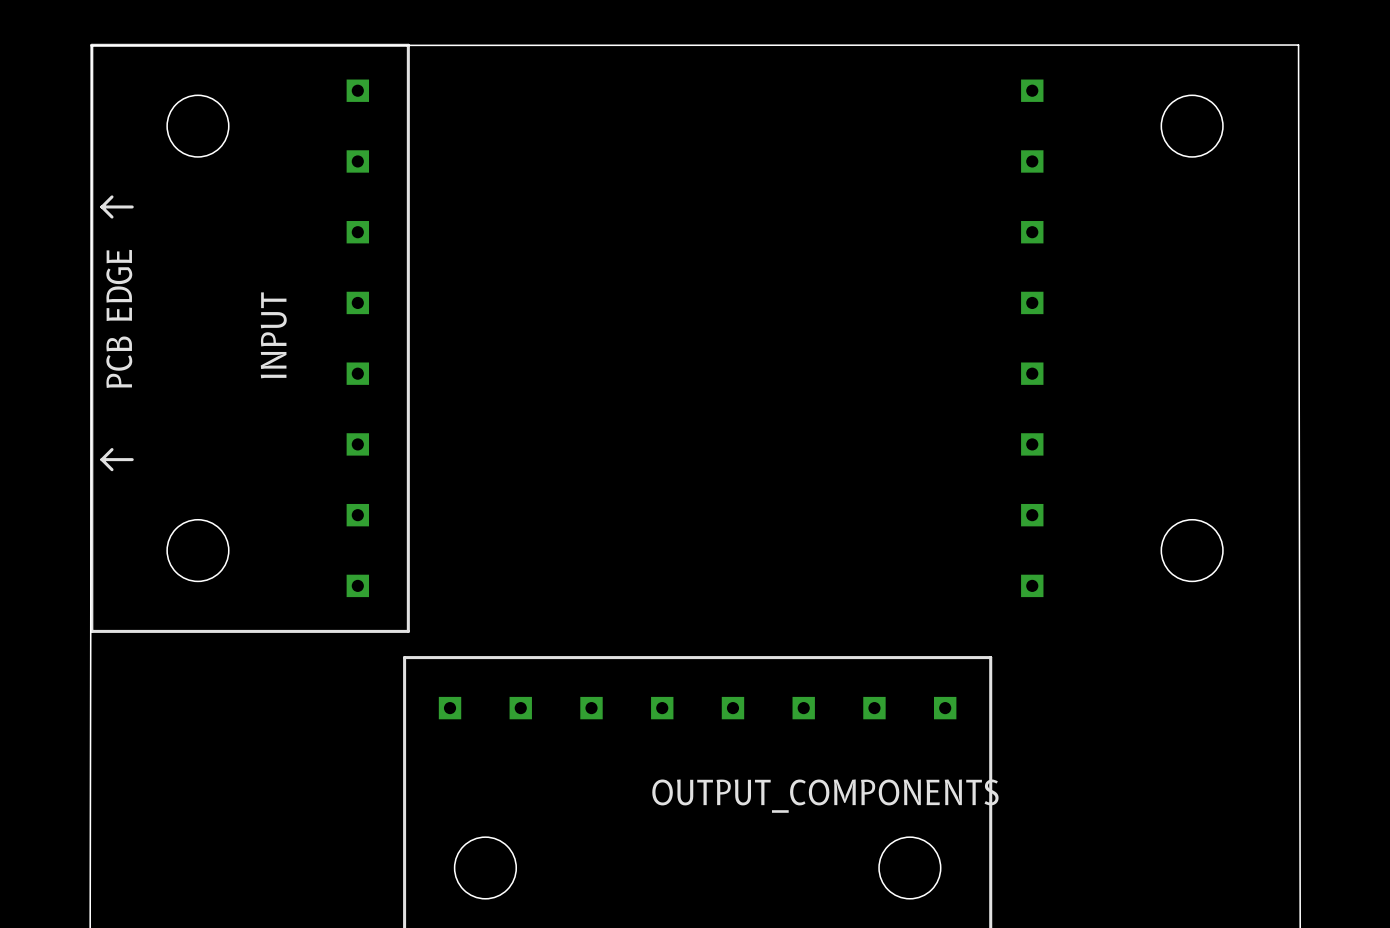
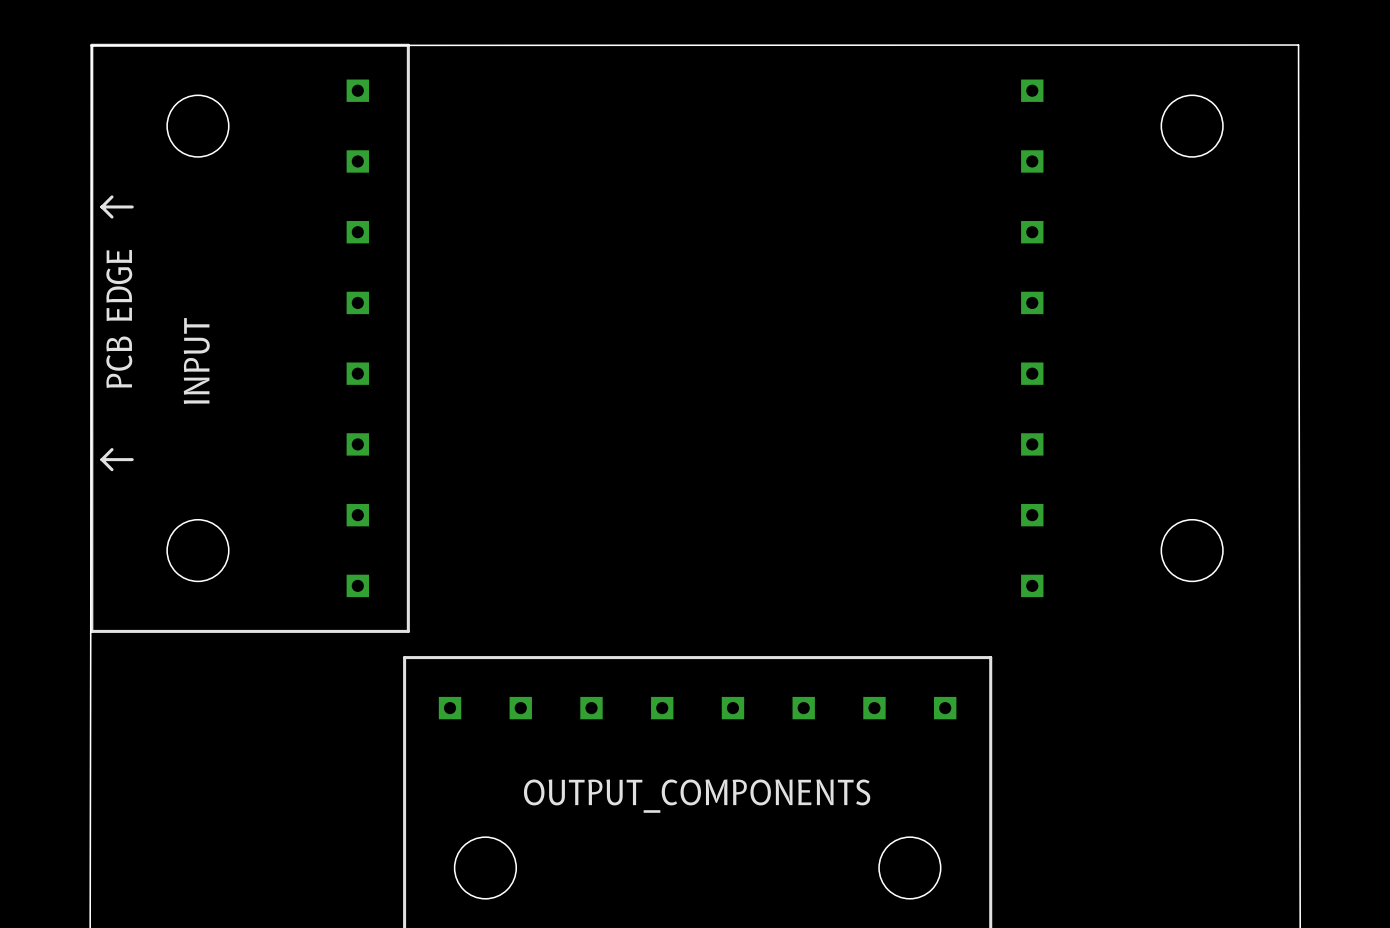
INPUT name position: INPUT (273, 335) -> INPUT (196, 361)
OUTPUT_COMPONENTS name position: OUTPUT_COMPONENTS (825, 796) -> OUTPUT_COMPONENTS (697, 796)

